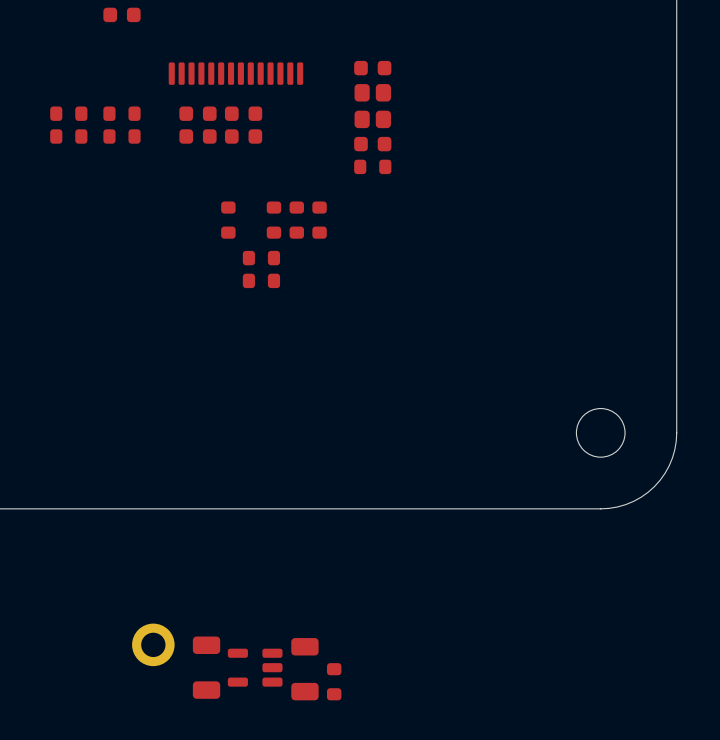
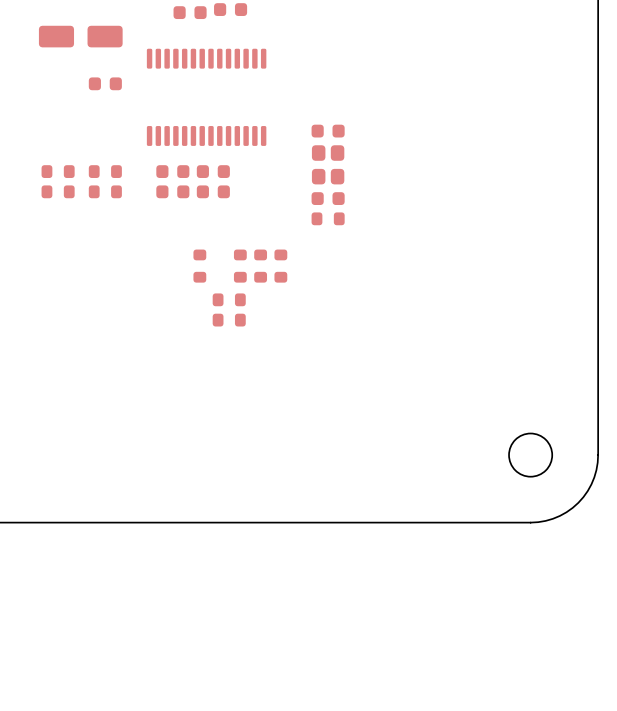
part: (153, 644) -> none
part: (206, 667) -> none
part: (255, 667) -> none
part: (304, 669) -> none
part: (334, 681) -> none

